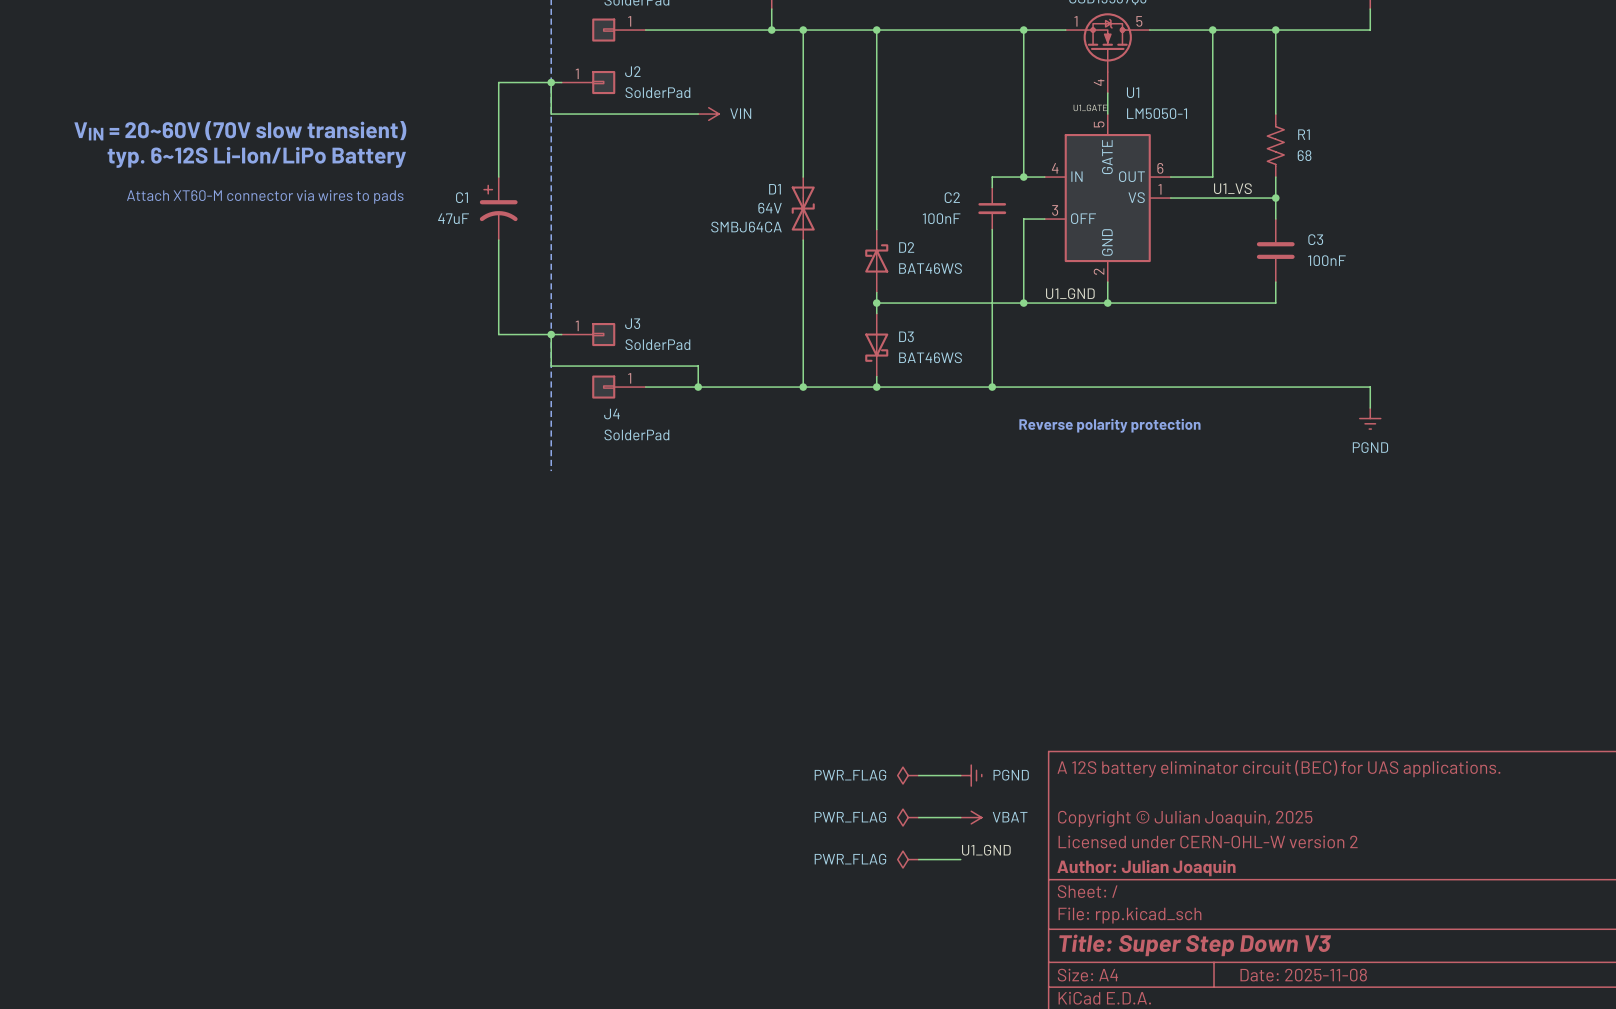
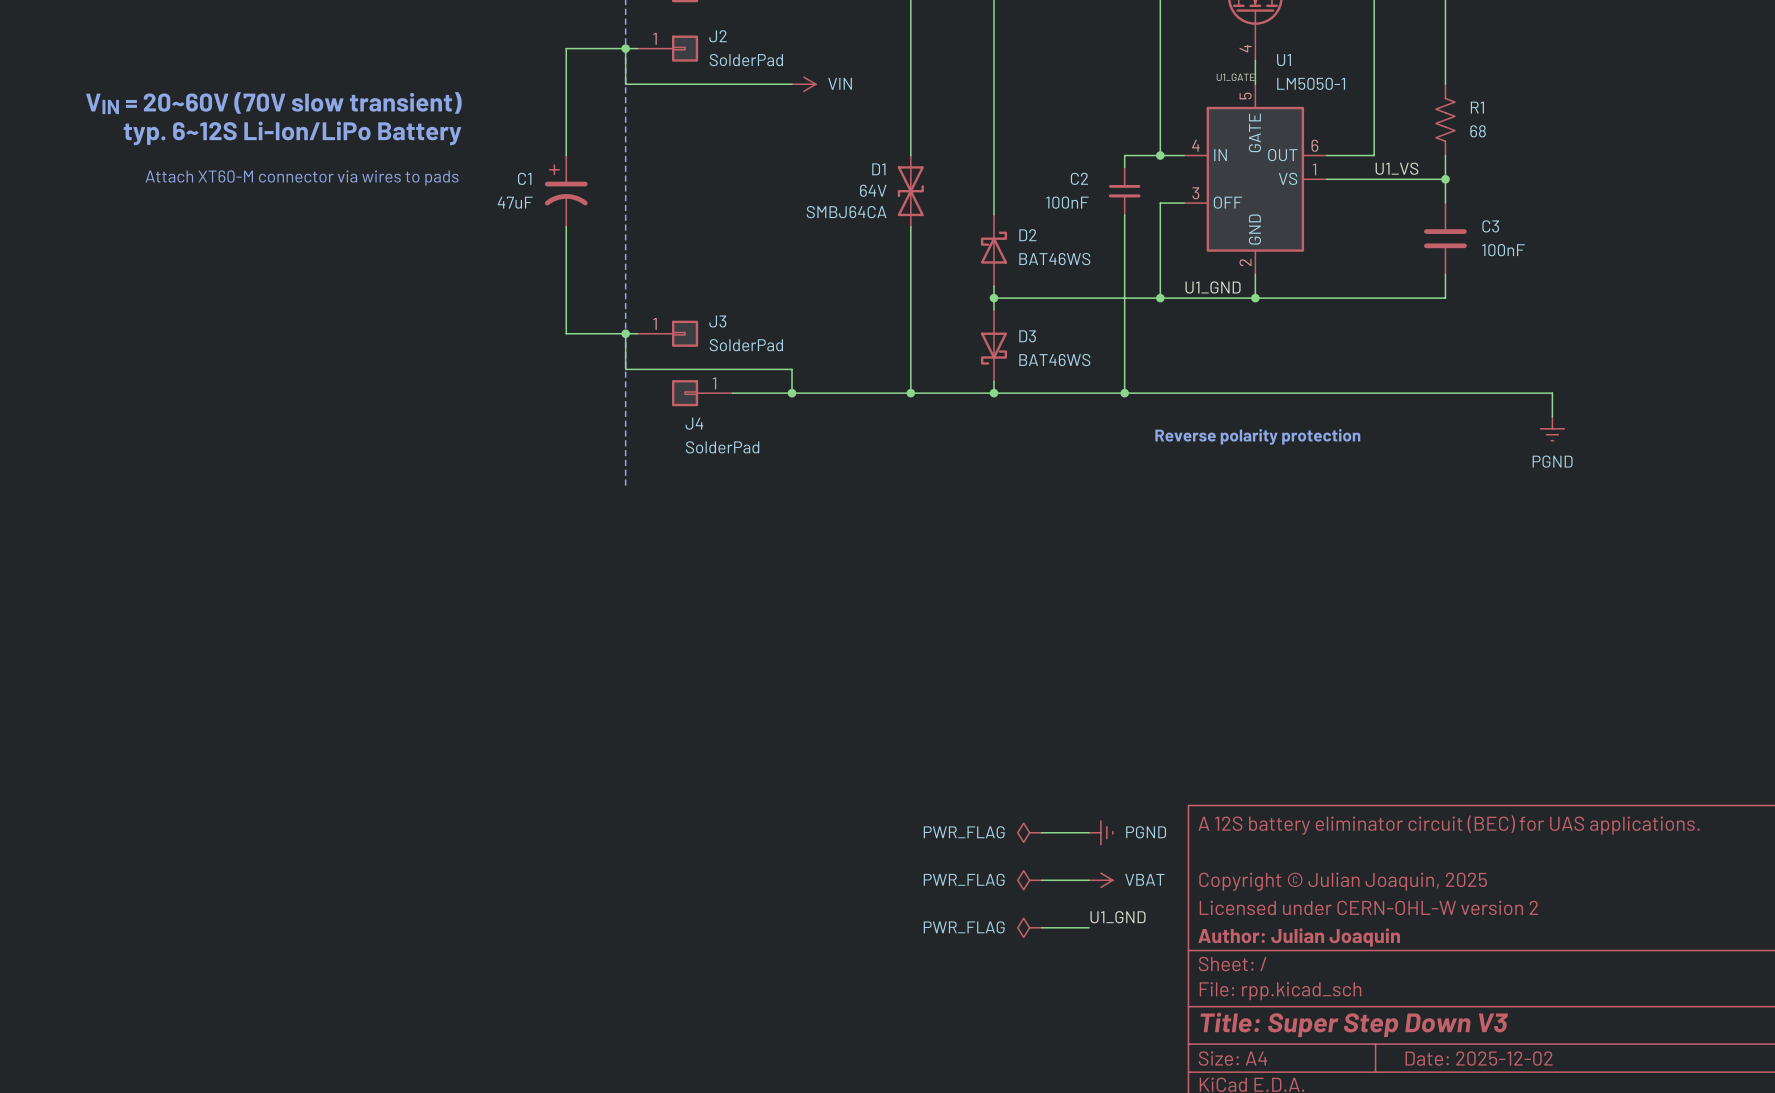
title block: Date: 2025-11-08 (1303, 975) -> Date: 2025-12-02 (1479, 1058)

